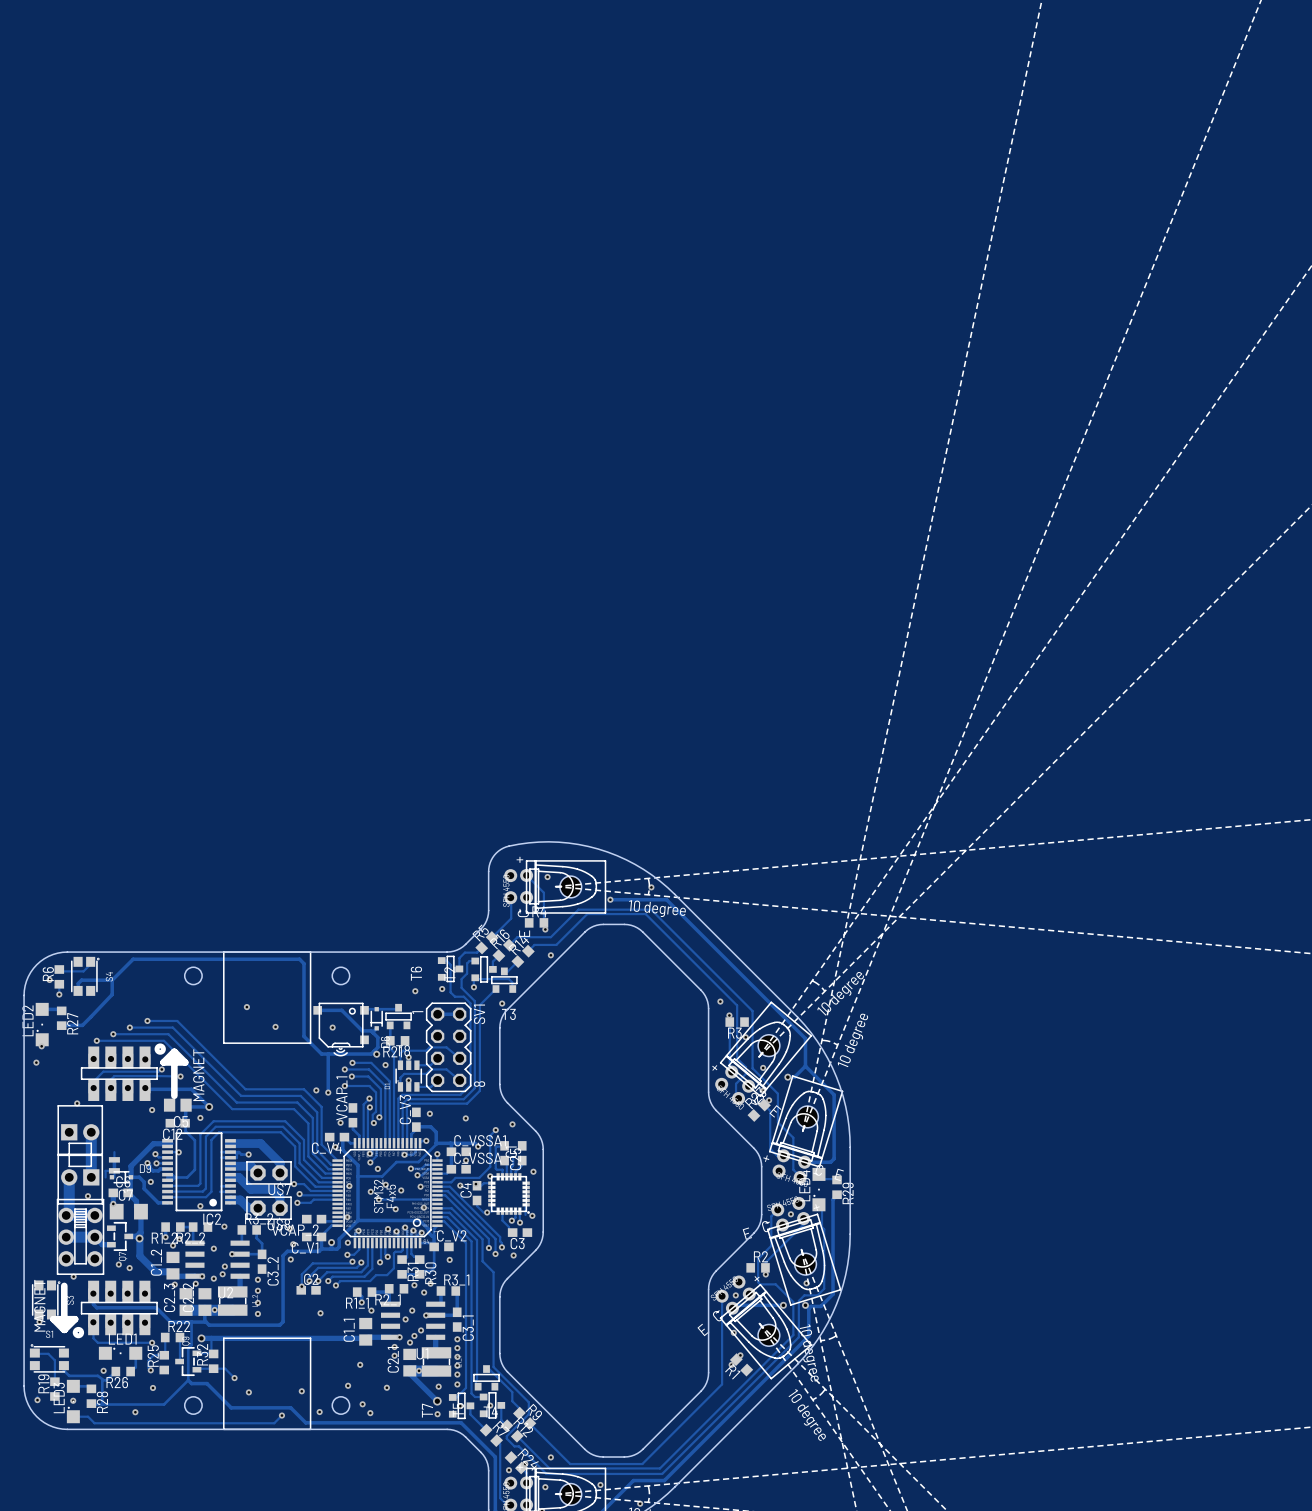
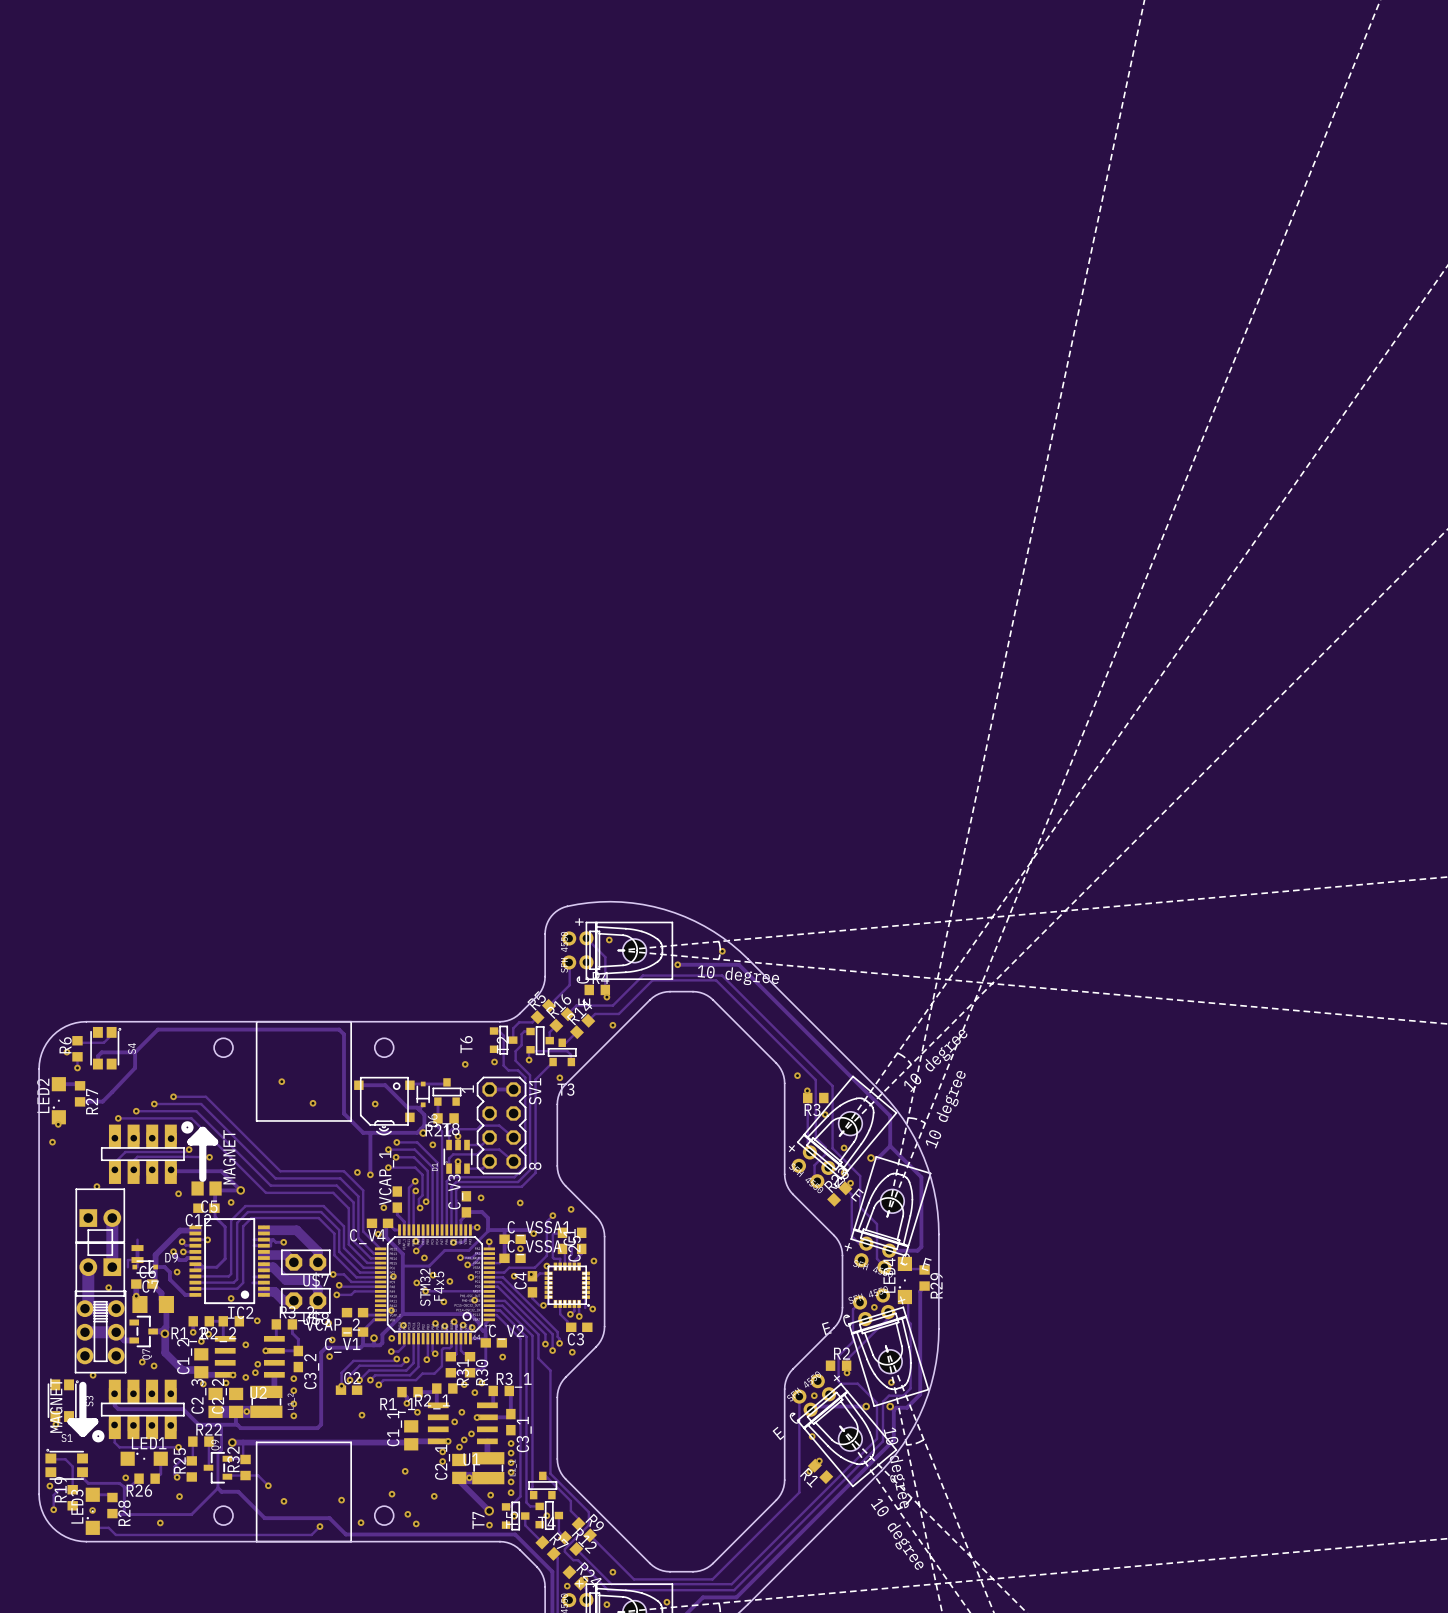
via: none -> (49, 1485)
track: none -> (72, 1489) (59, 1489) (53, 1495) (53, 1506)

